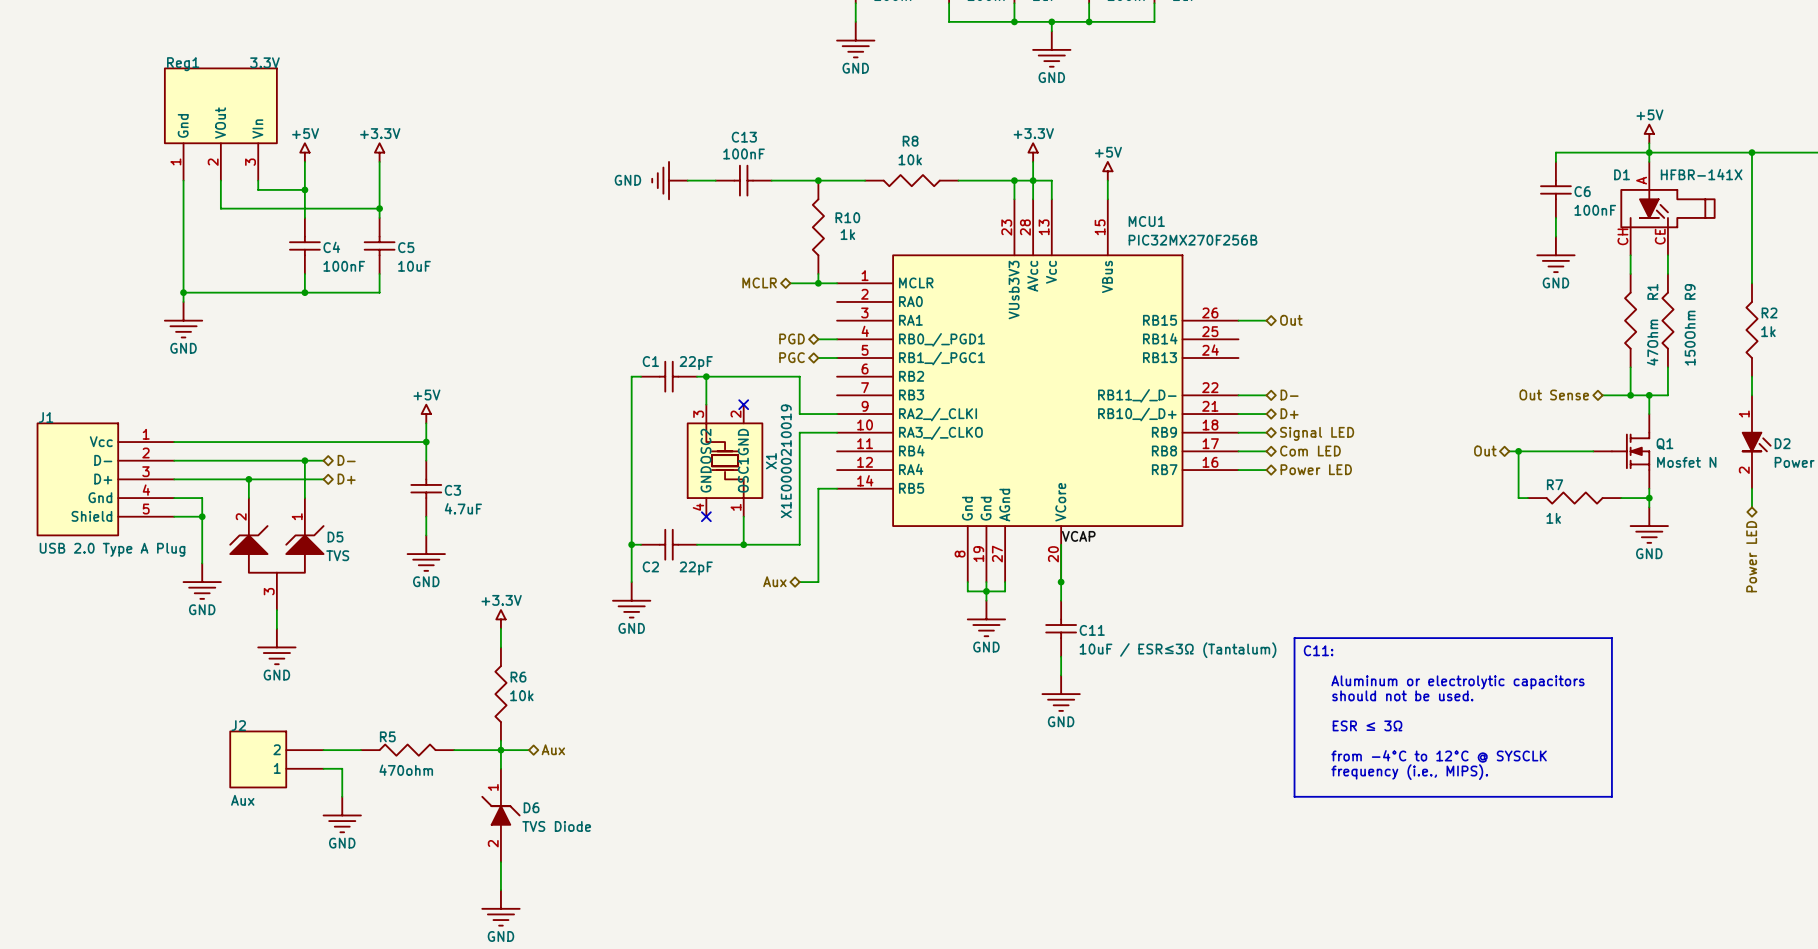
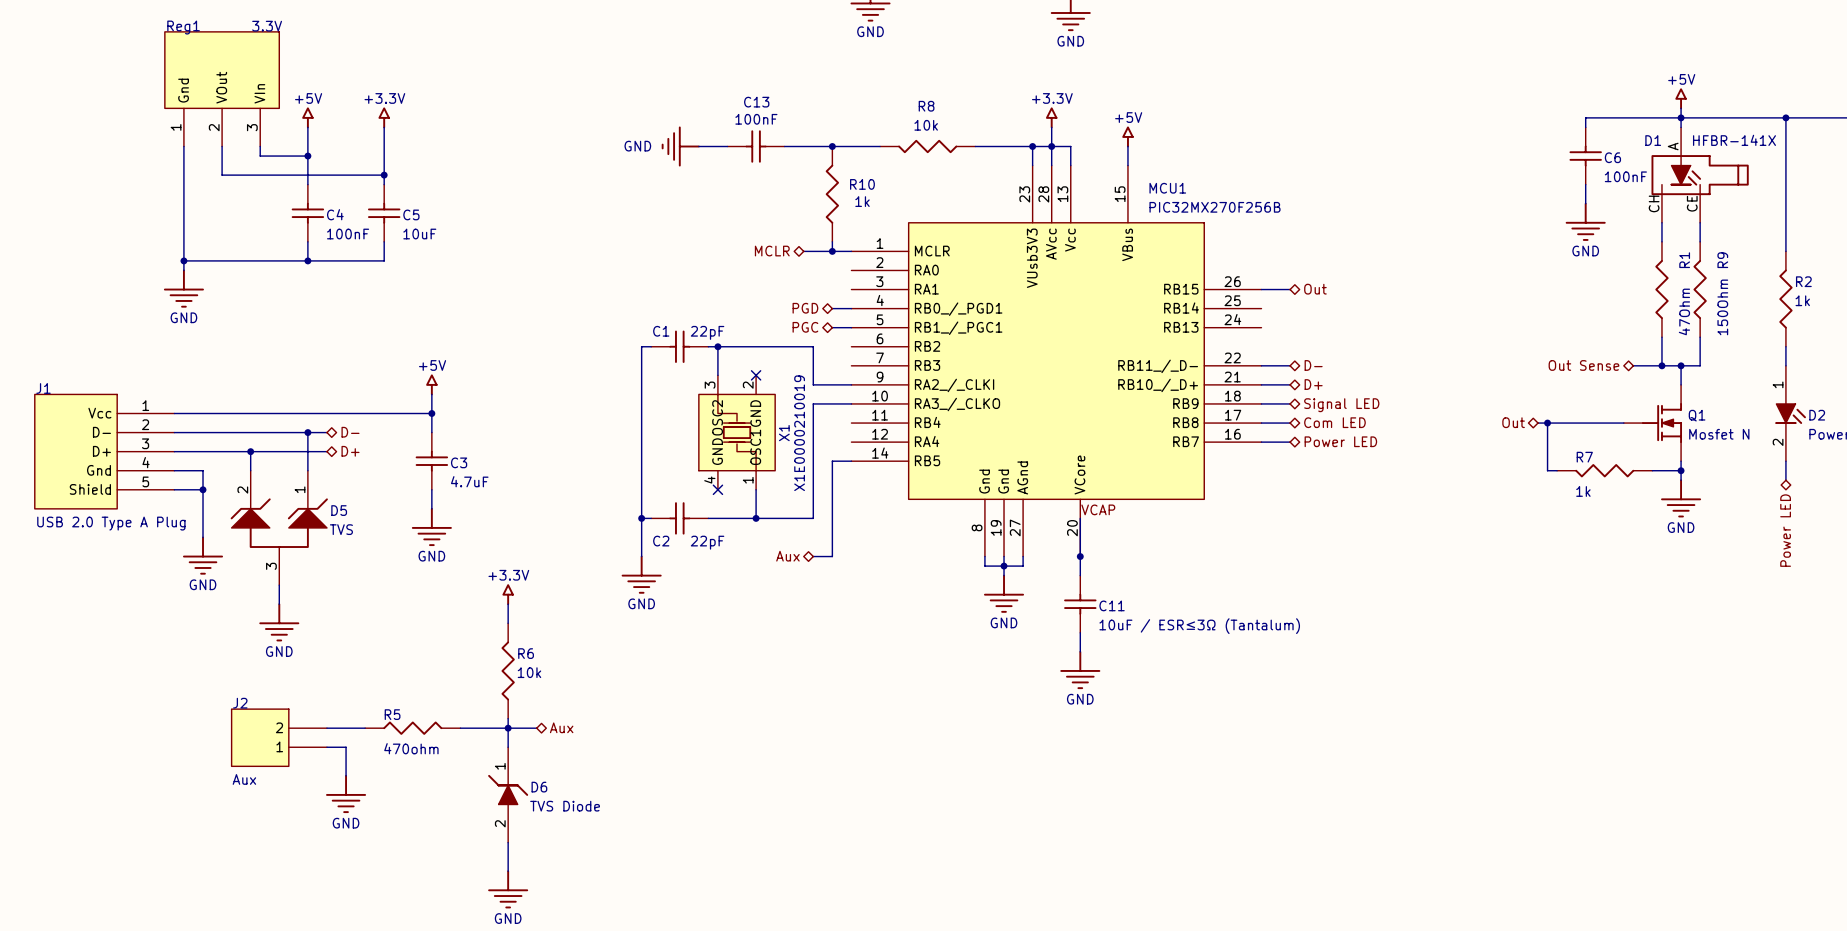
line: (1294, 638) (1611, 638) (1611, 796) (1294, 796) (1294, 638) -> none
text: C11: (1318, 650) -> none
text: Aluminum or electrolytic capacitors (1457, 682) -> none
text: should not be used. (1402, 695) -> none
text: ESR ≤ 3Ω (1367, 725) -> none
text: from -4°C to 12°C @ SYSCLK (1439, 756) -> none
text: frequency (i.e., MIPS). (1409, 772) -> none

